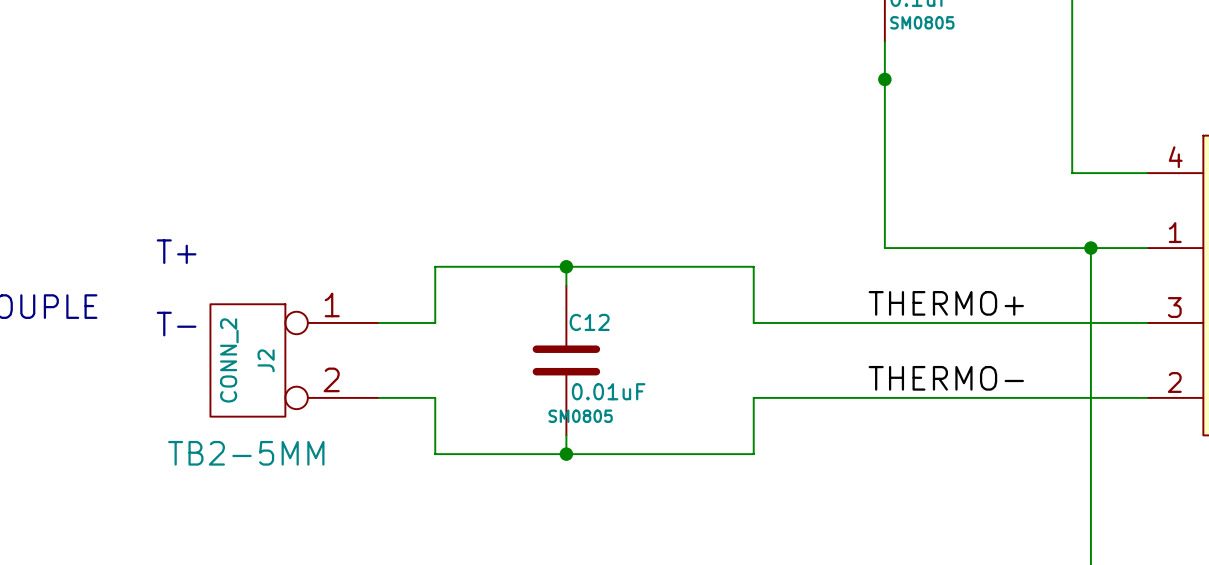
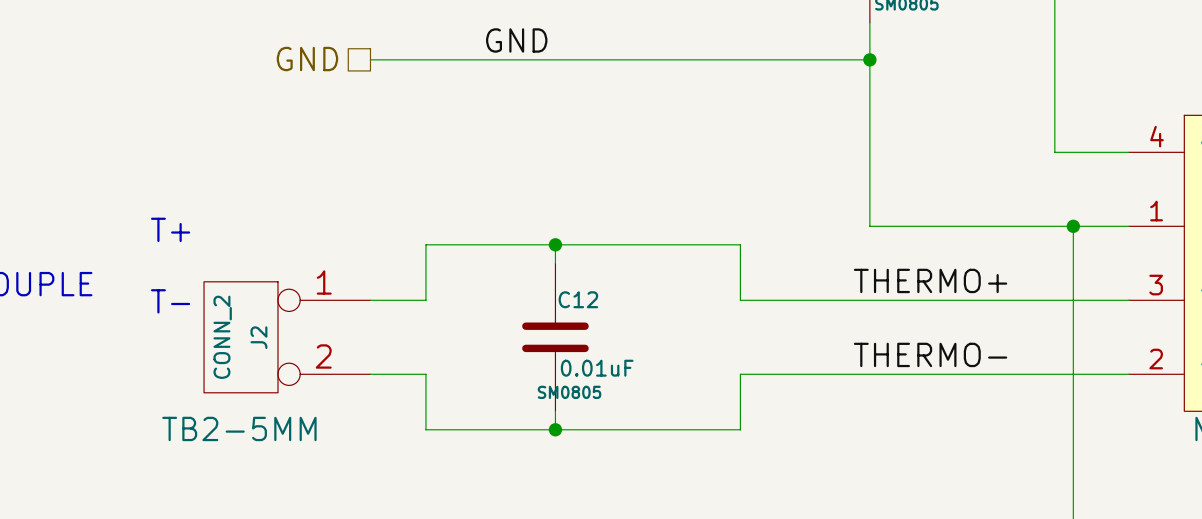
label: none -> GND (516, 40)
hierarchical label: none -> GND (307, 59)
wire: none -> (370, 59) (869, 59)

